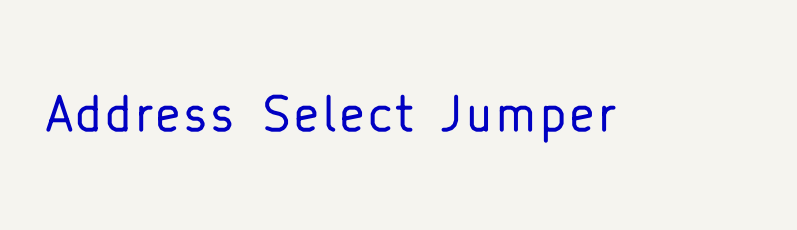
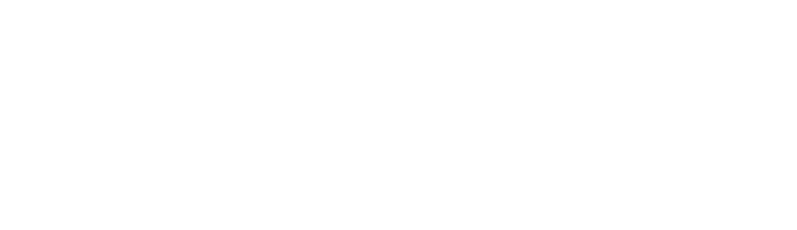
text: Address Select Jumper (330, 118) -> none

